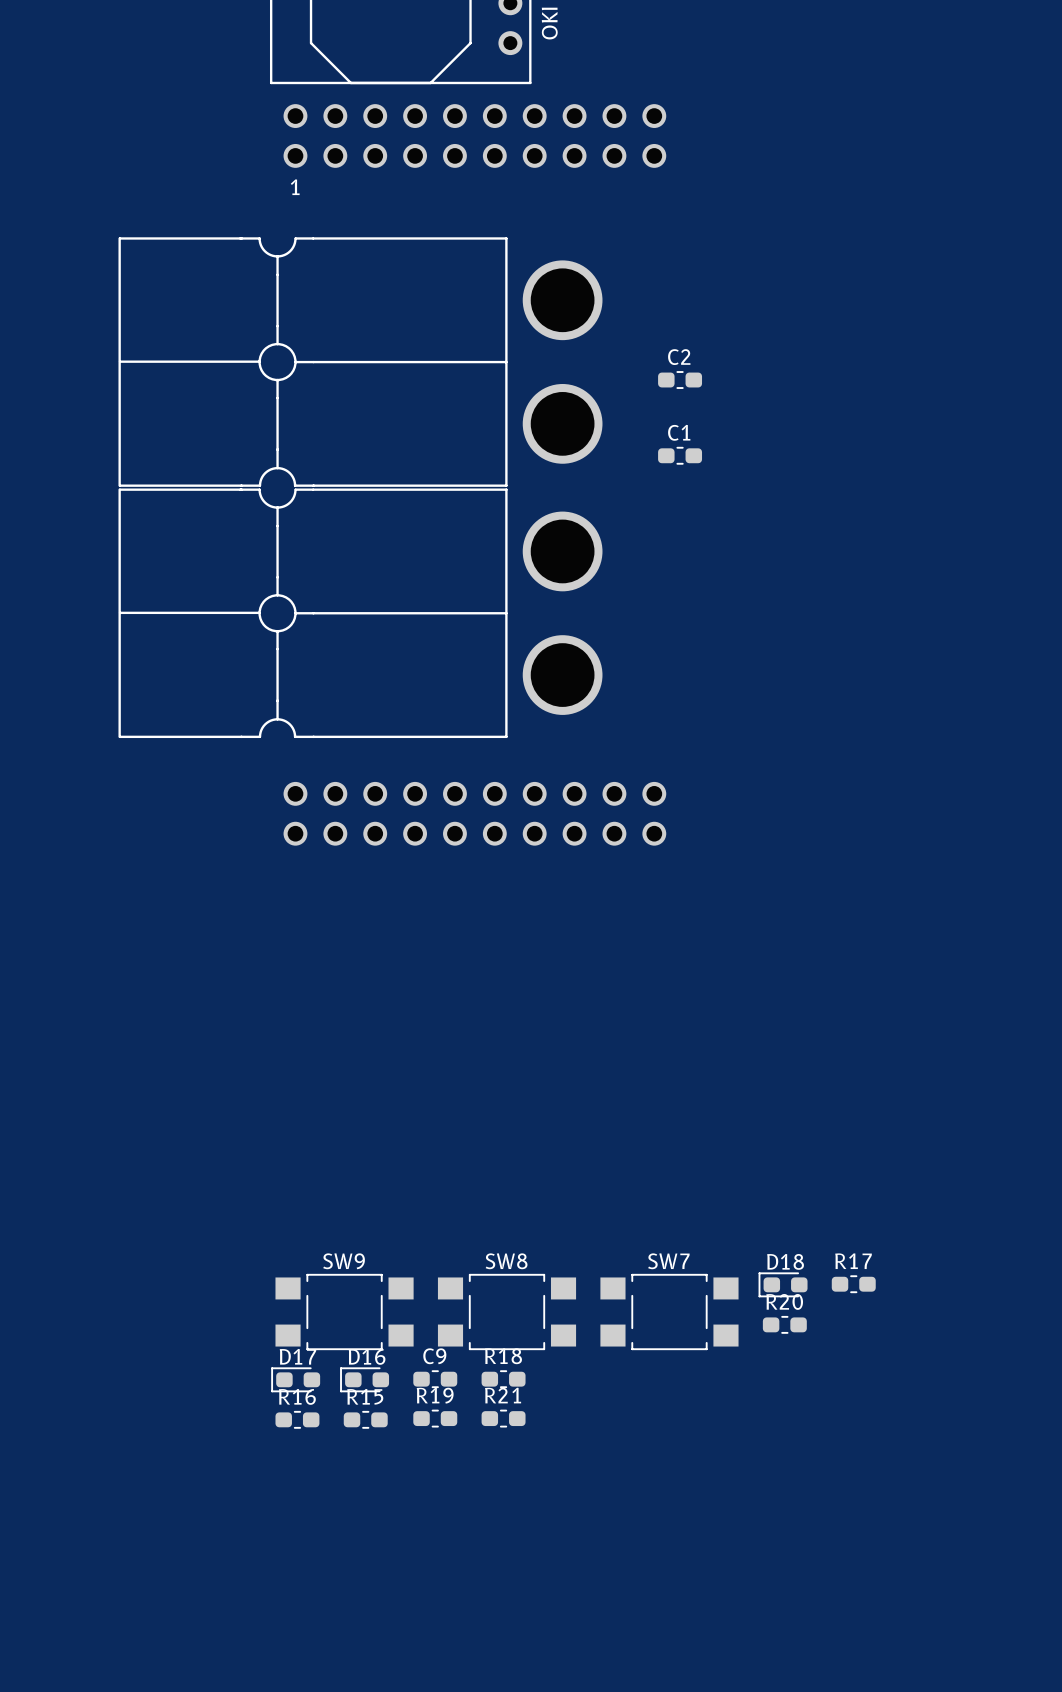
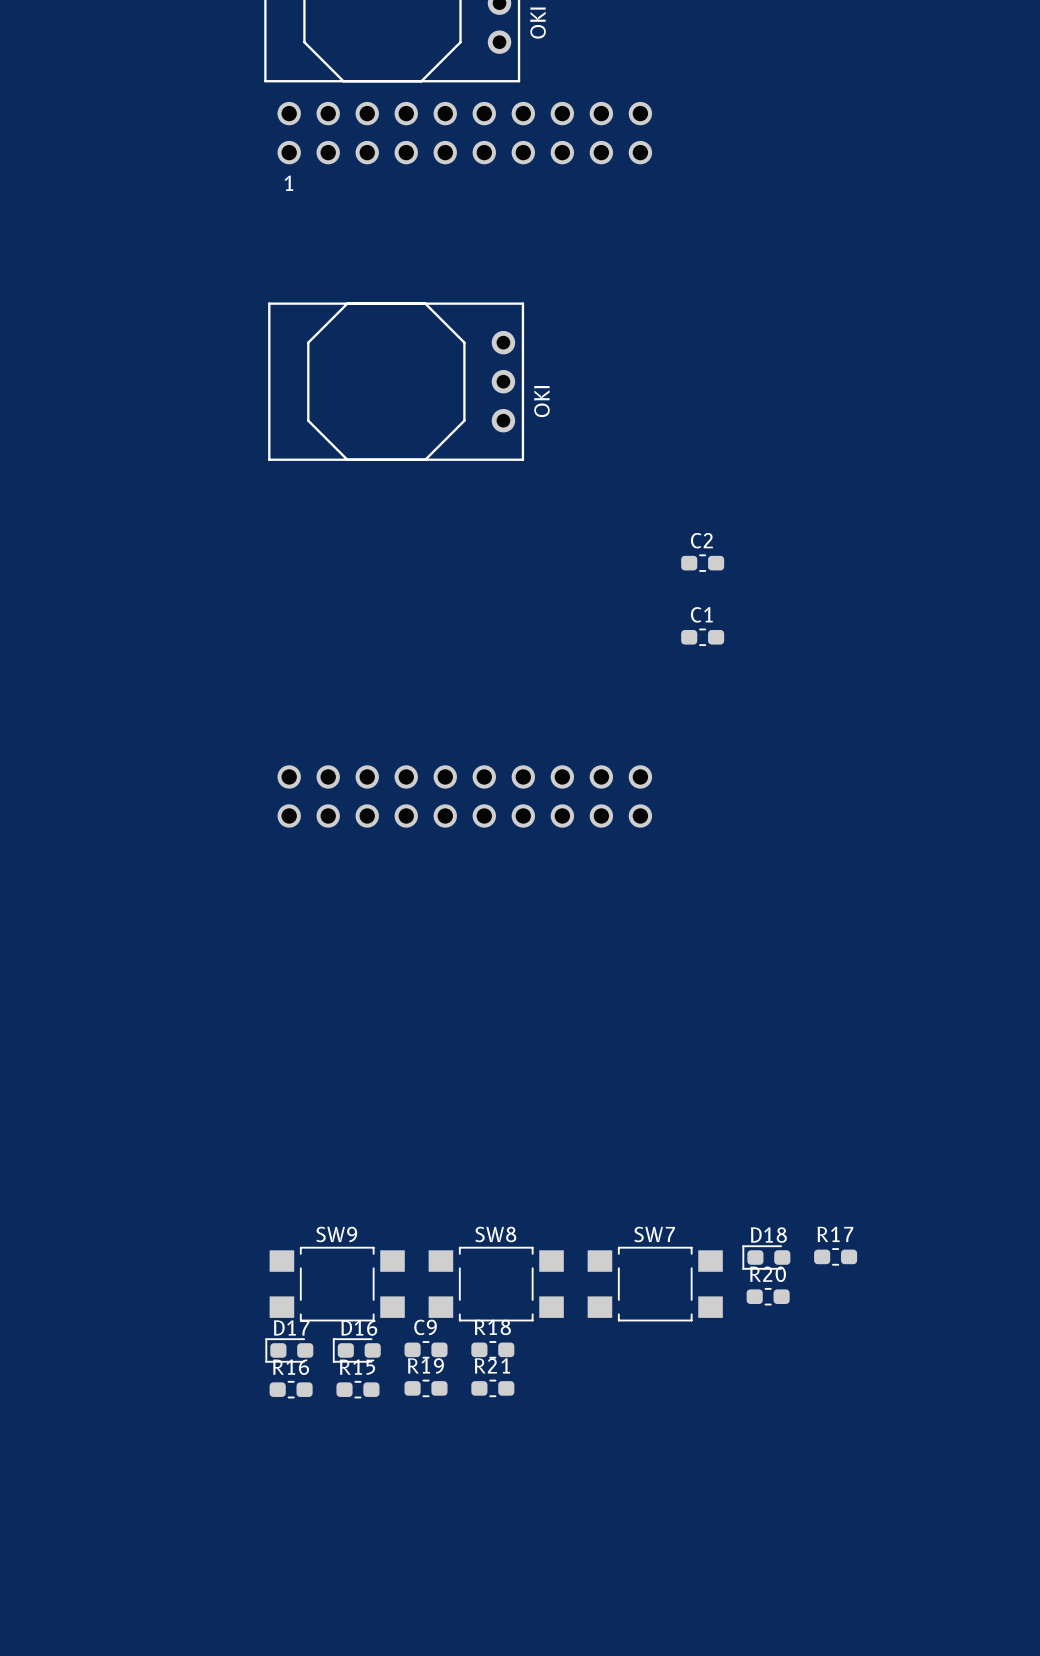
part: (360, 362) -> none
C2 position: (680, 380) -> (702, 563)
part: none -> OKI (396, 381)
C1 position: (680, 455) -> (702, 637)
part: (360, 613) -> none

